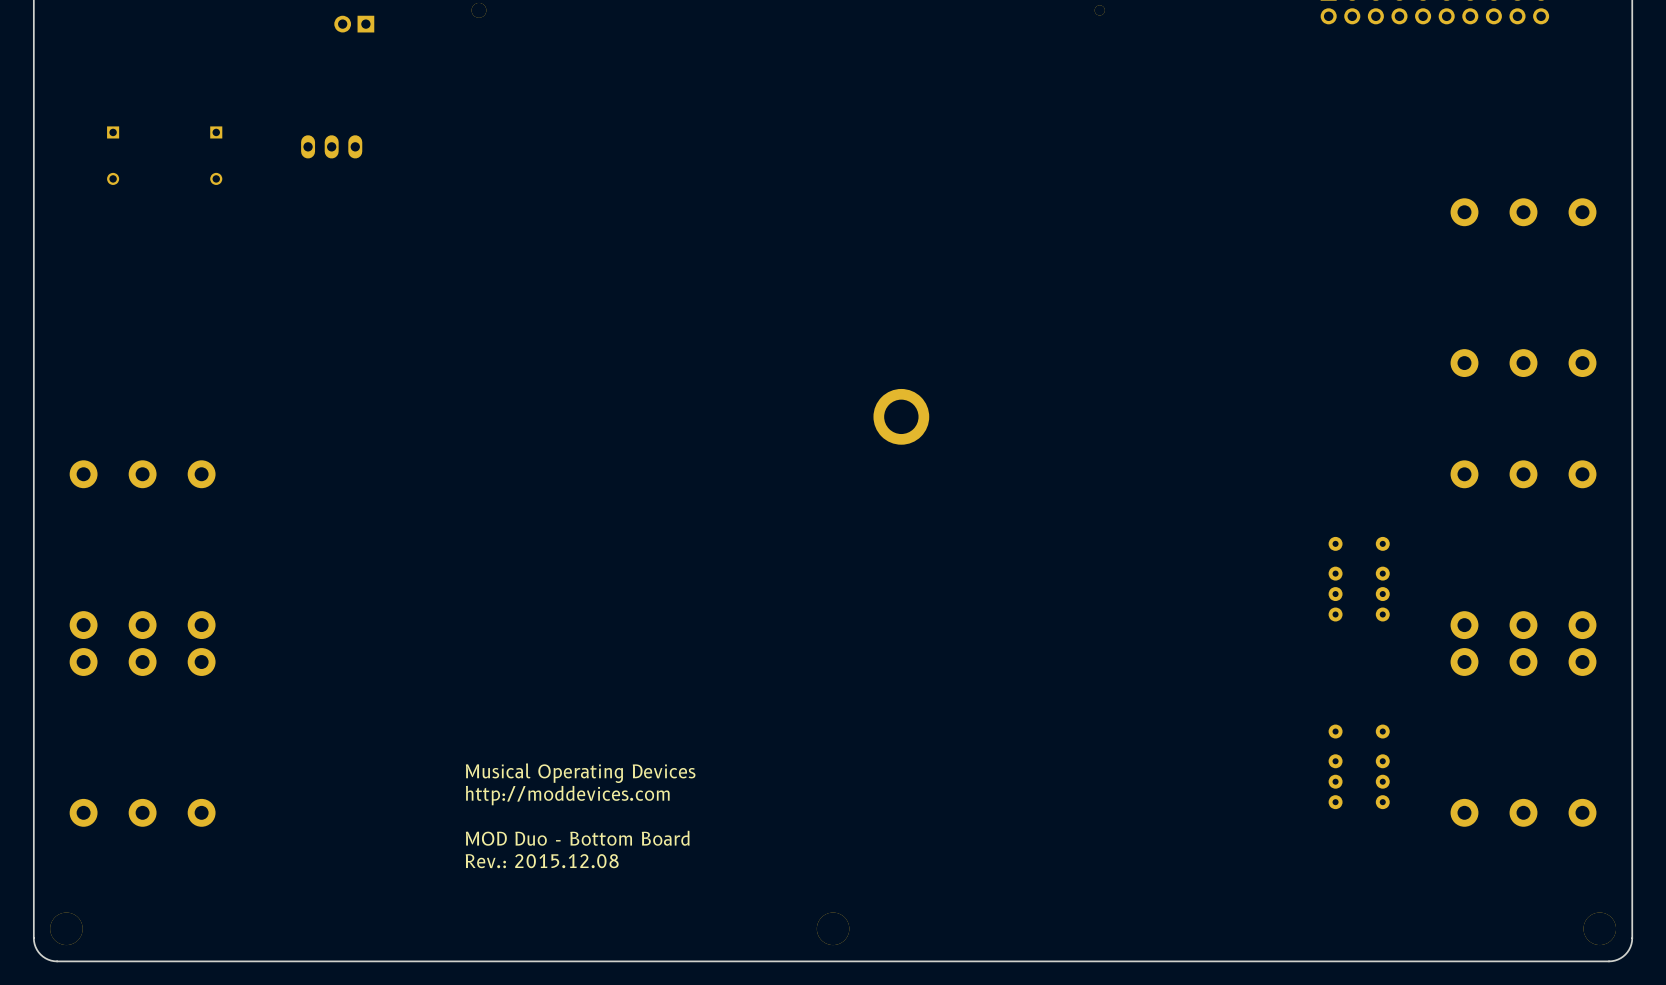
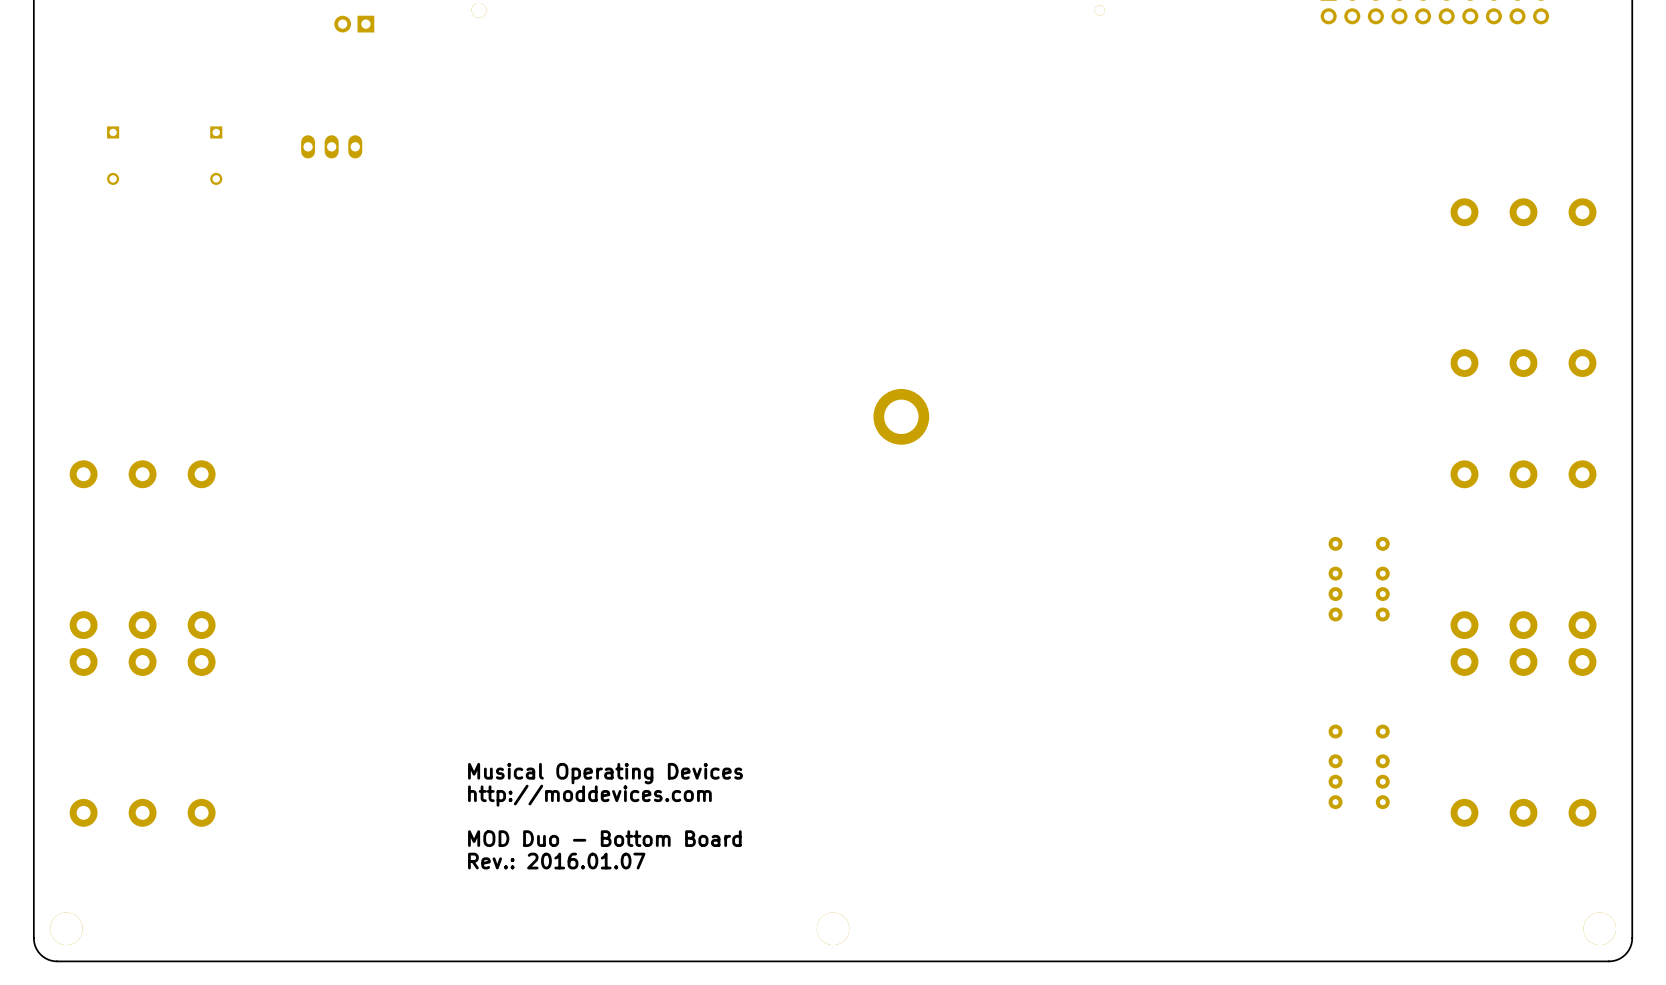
text: Rev.: 2015.12.08 (542, 861) -> Rev.: 2016.01.07 (556, 861)

